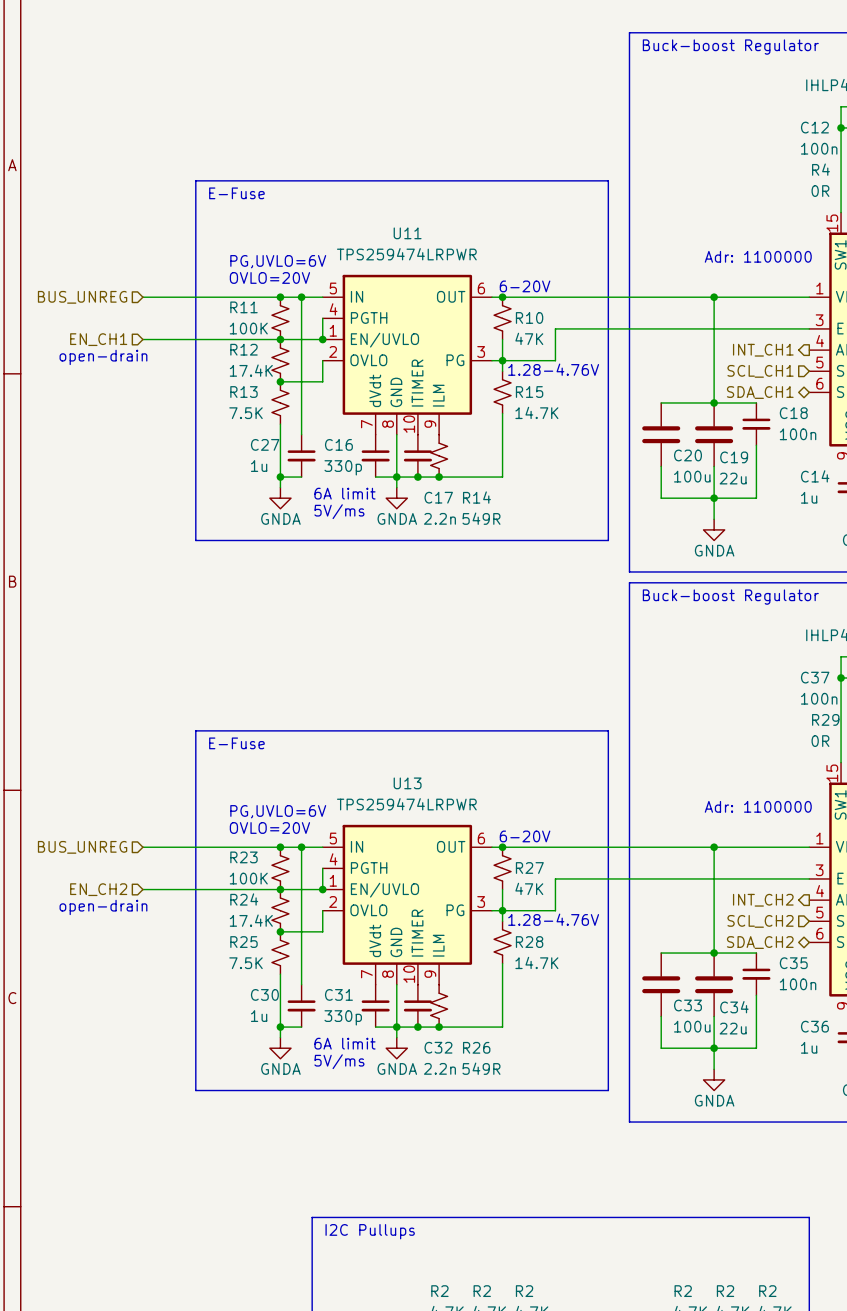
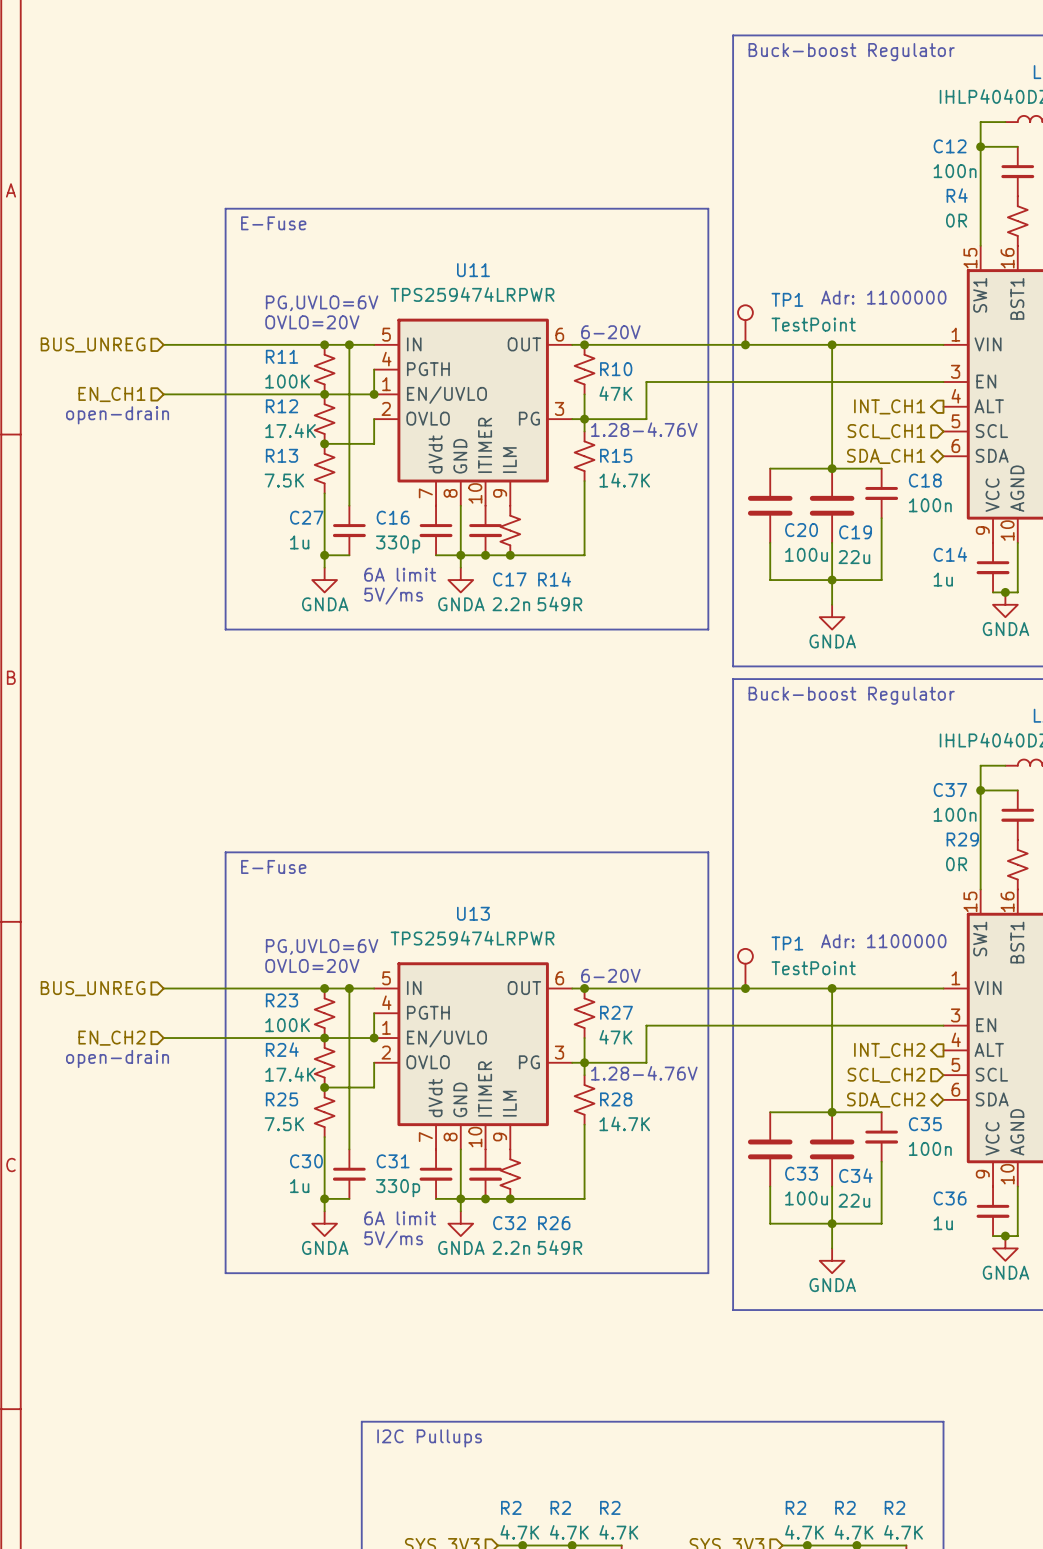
TP1: none -> TestPoint (745, 325)
junction: none -> (745, 344)
TP1: none -> TestPoint (745, 968)
junction: none -> (745, 988)

